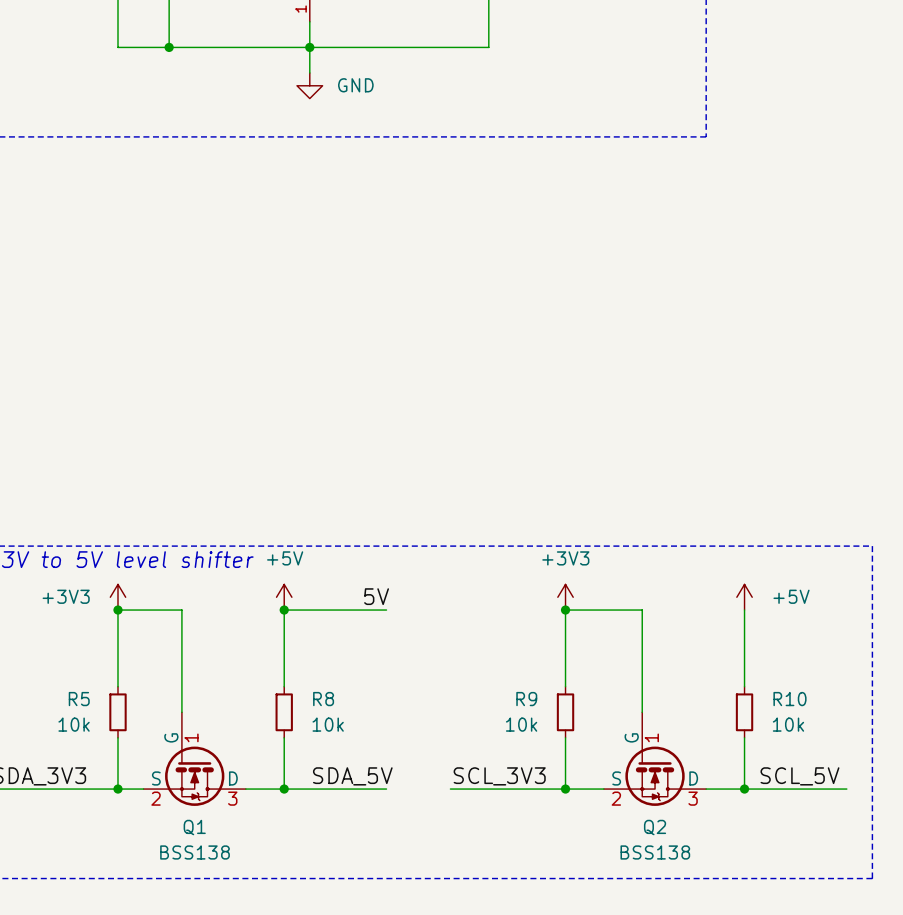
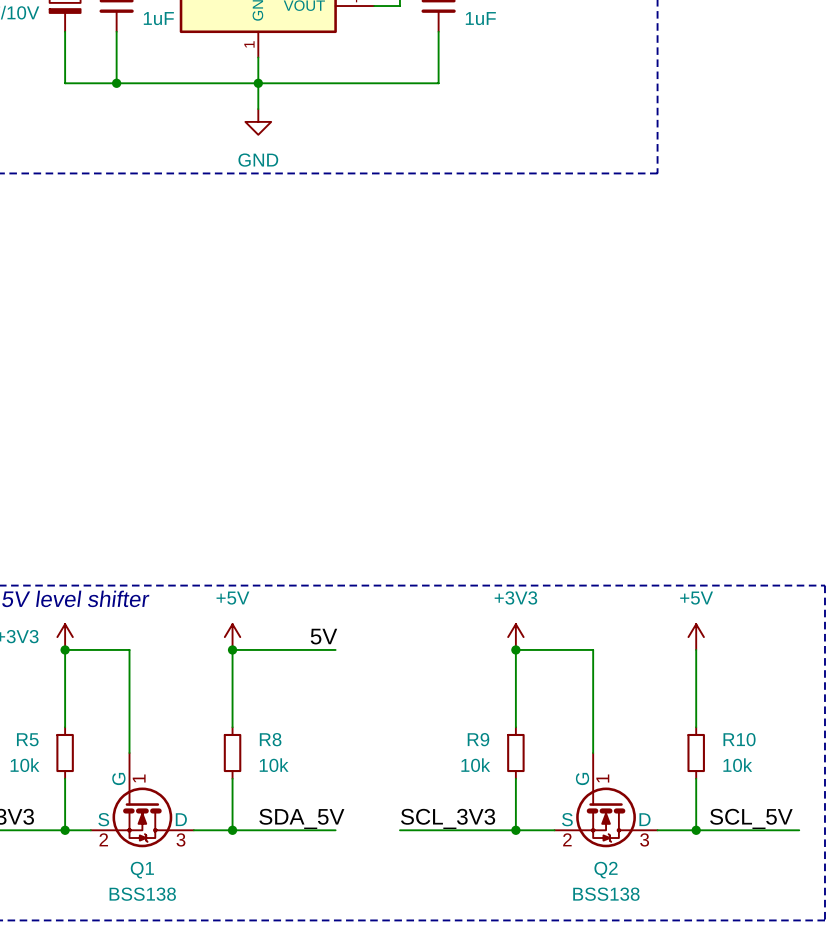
power symbol text position: GND (355, 85) -> GND (258, 160)
power symbol text position: +5V (791, 596) -> +5V (696, 598)

